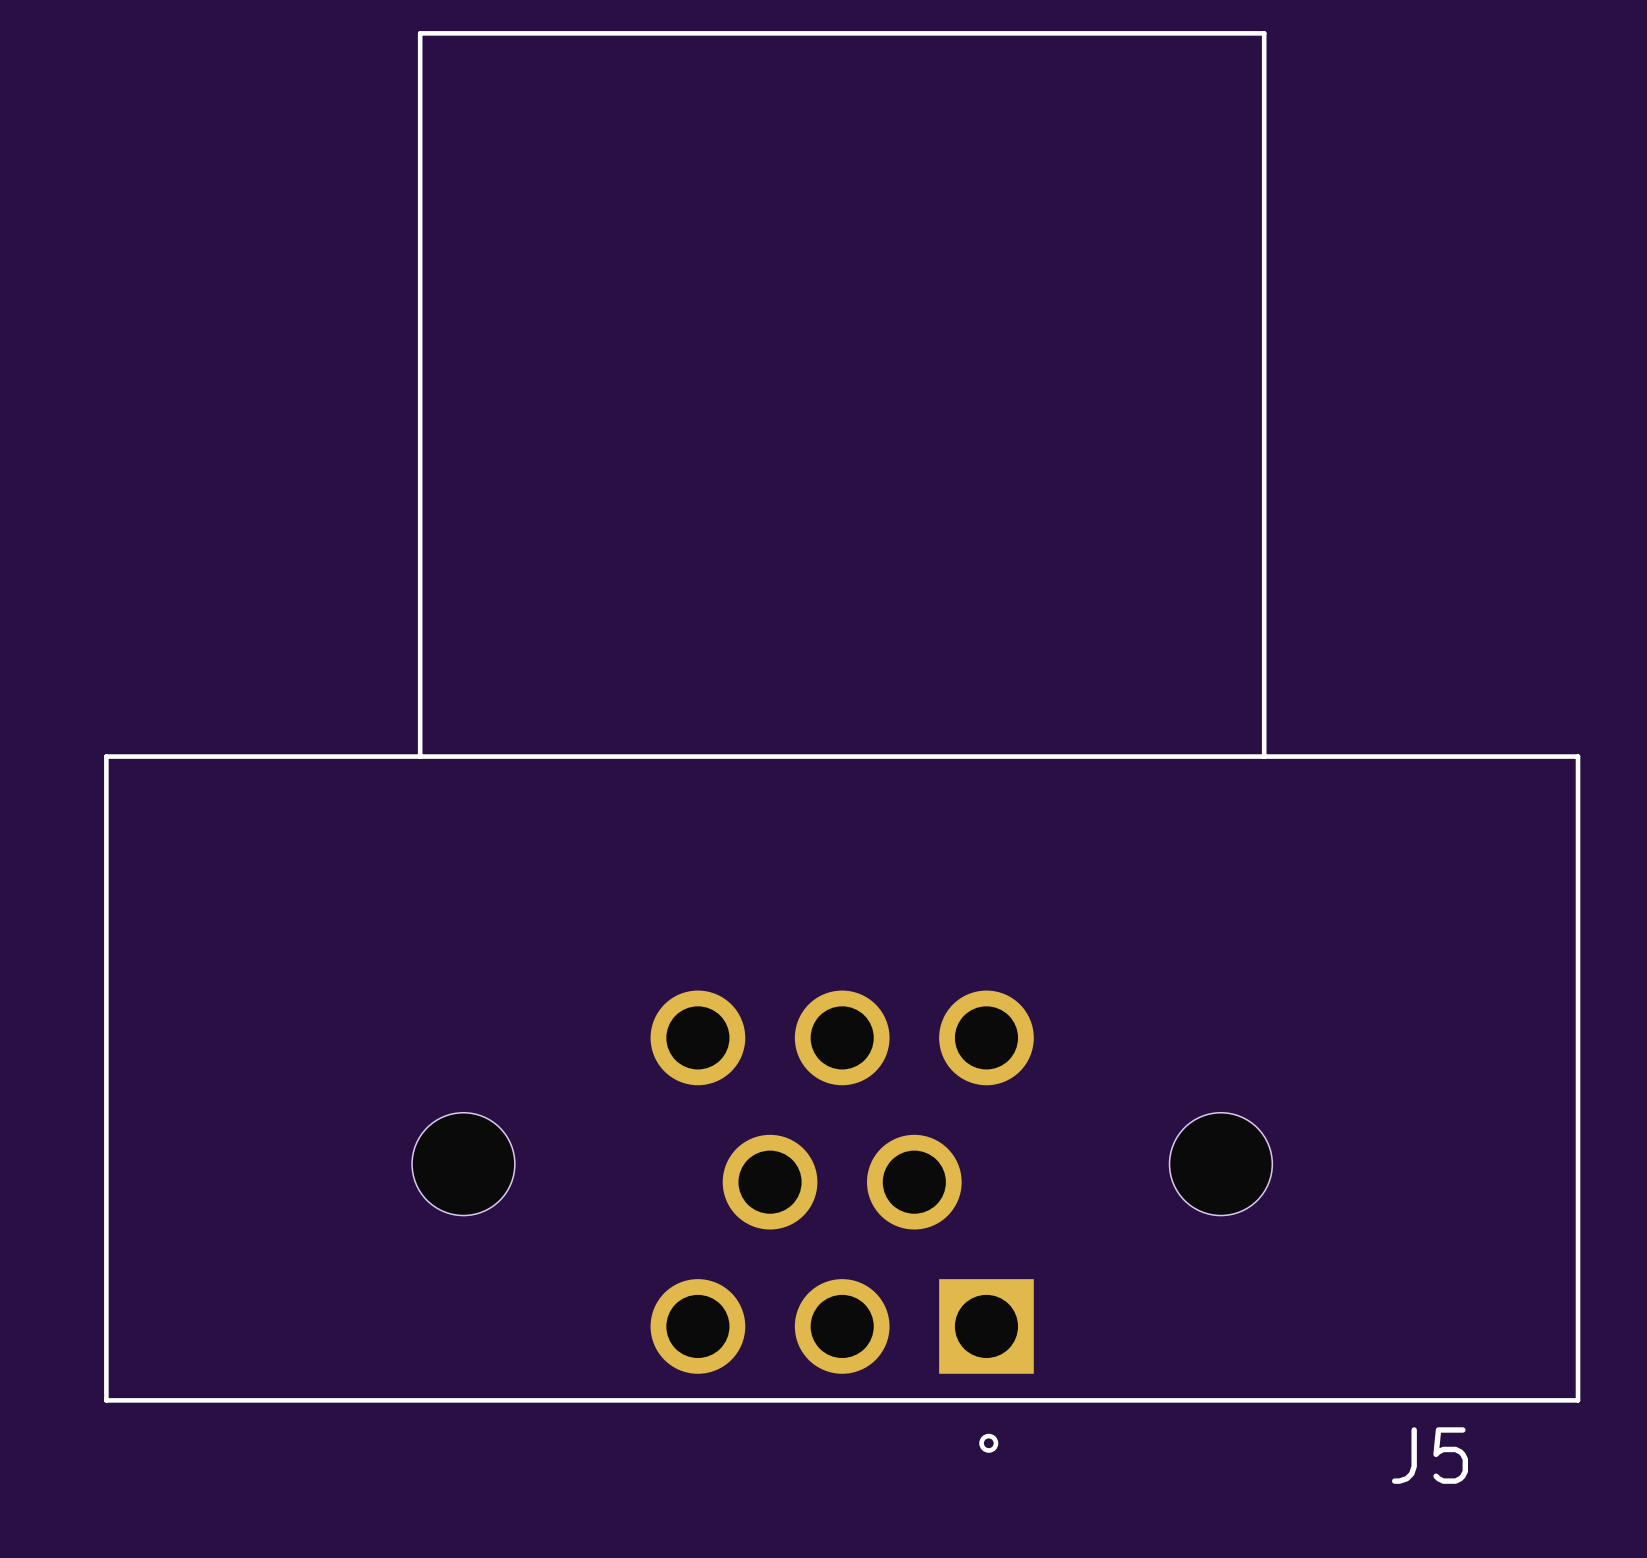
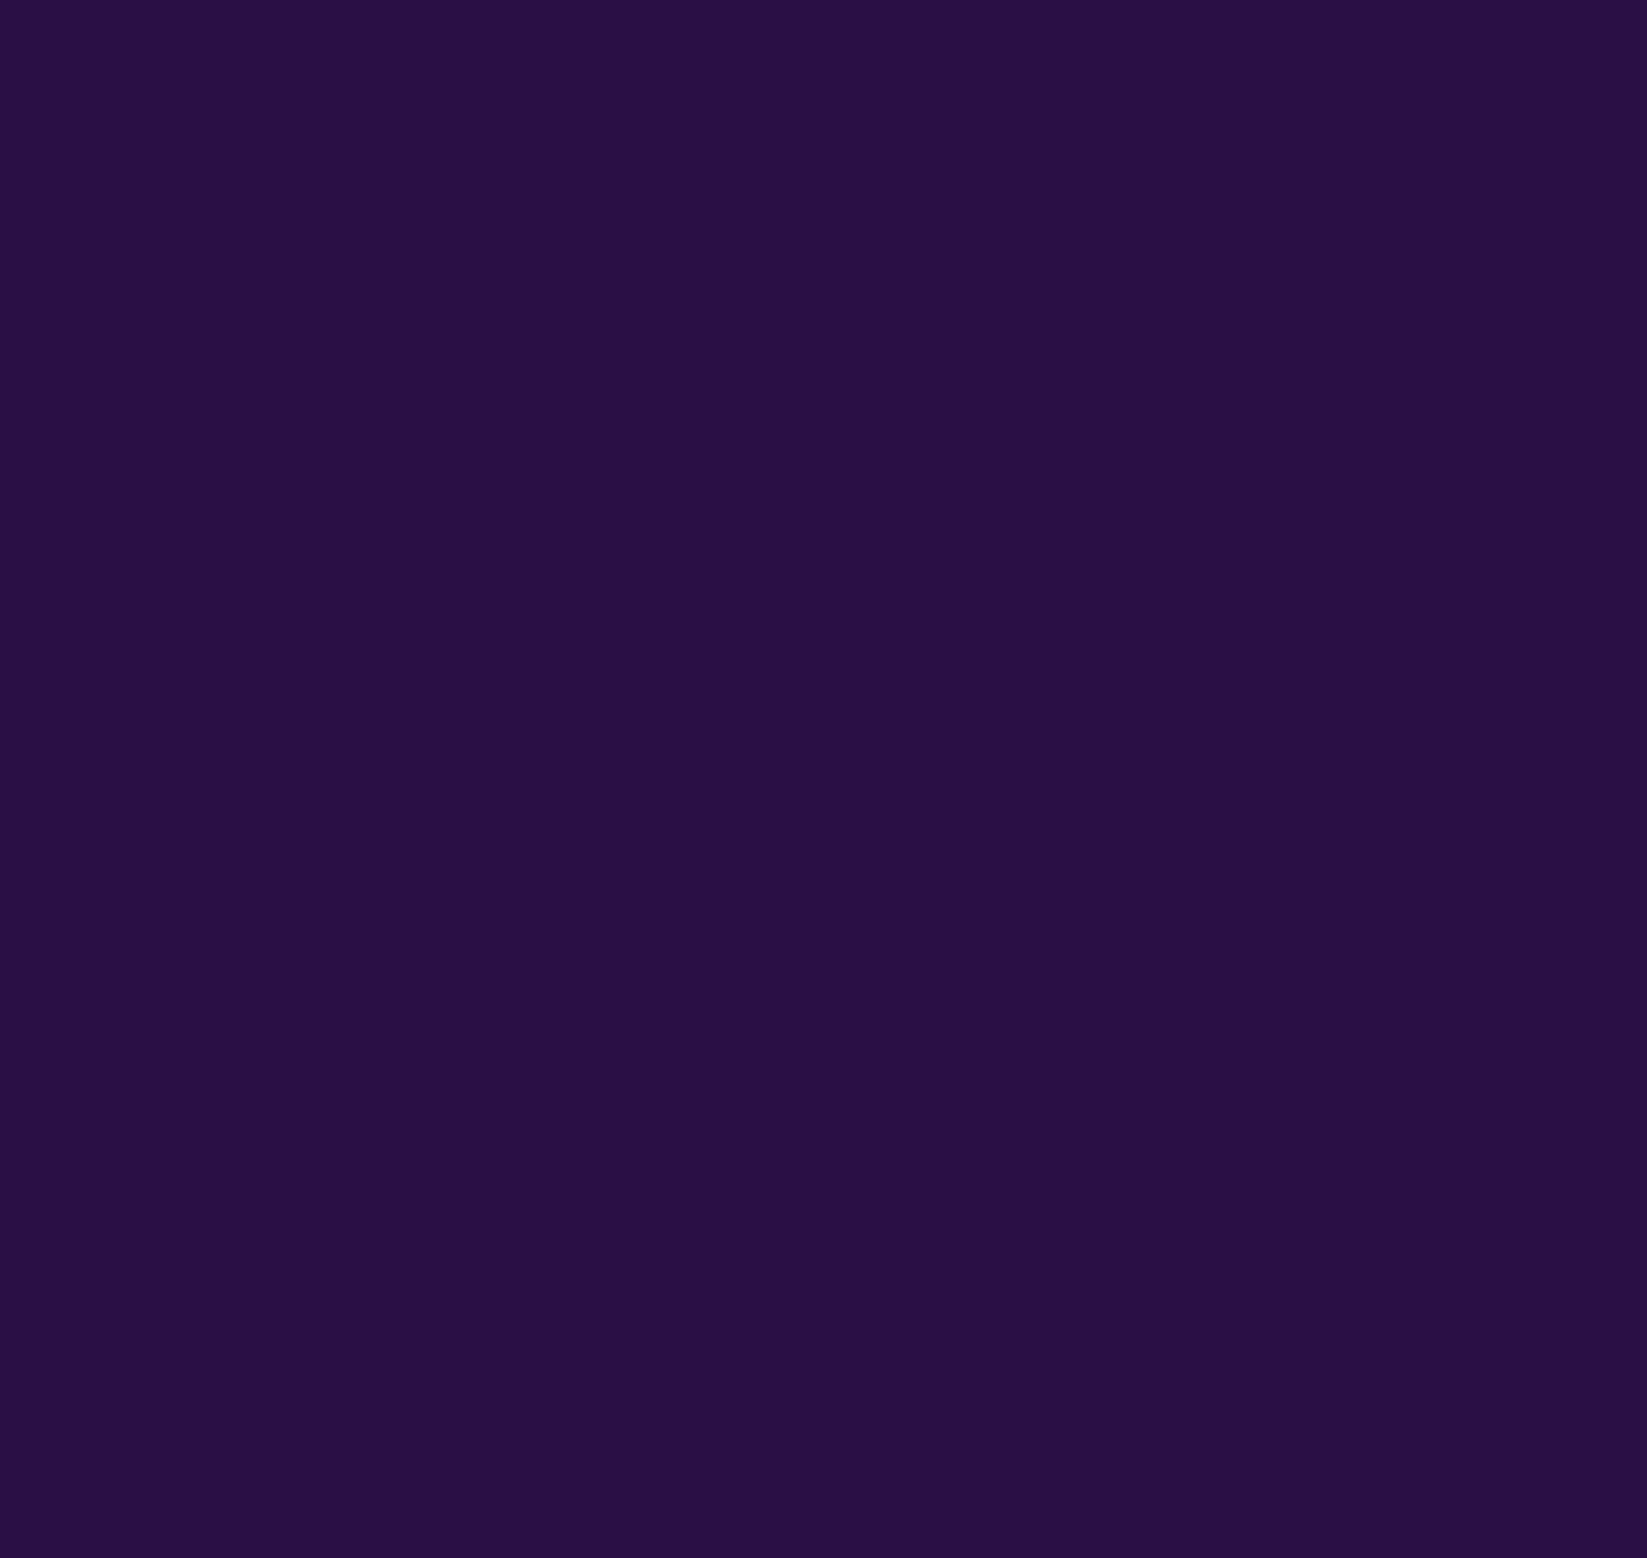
J5: (842, 741) -> none

